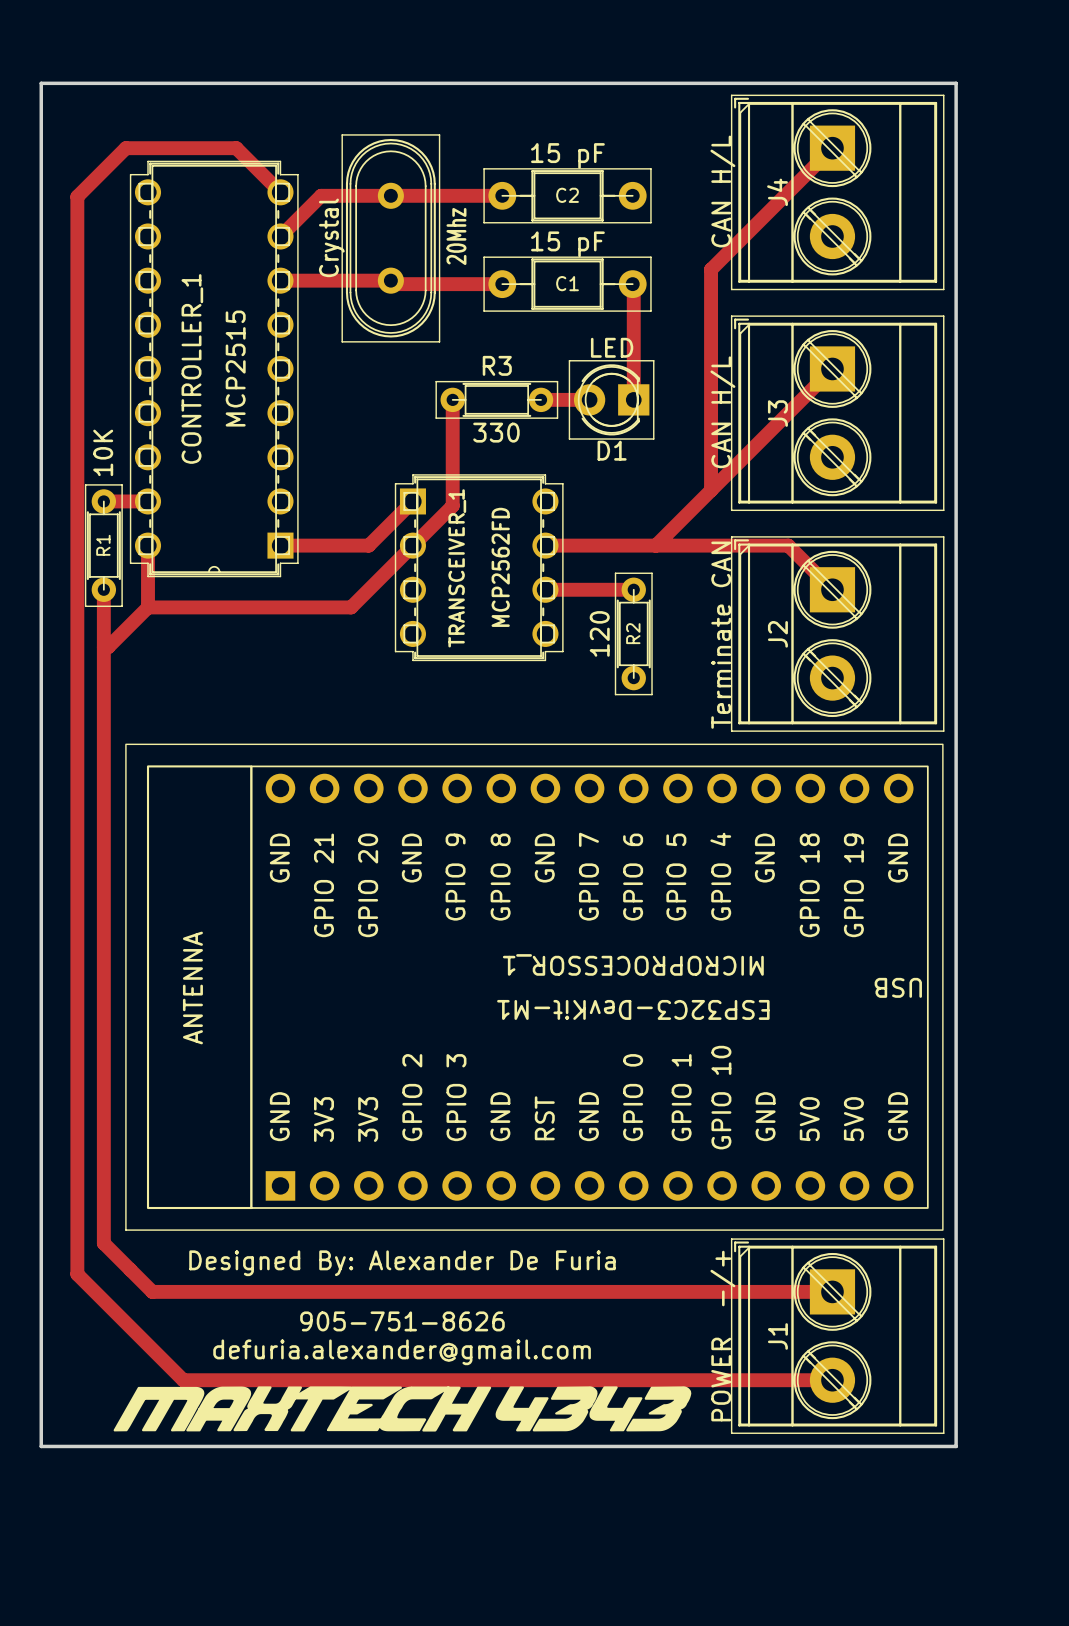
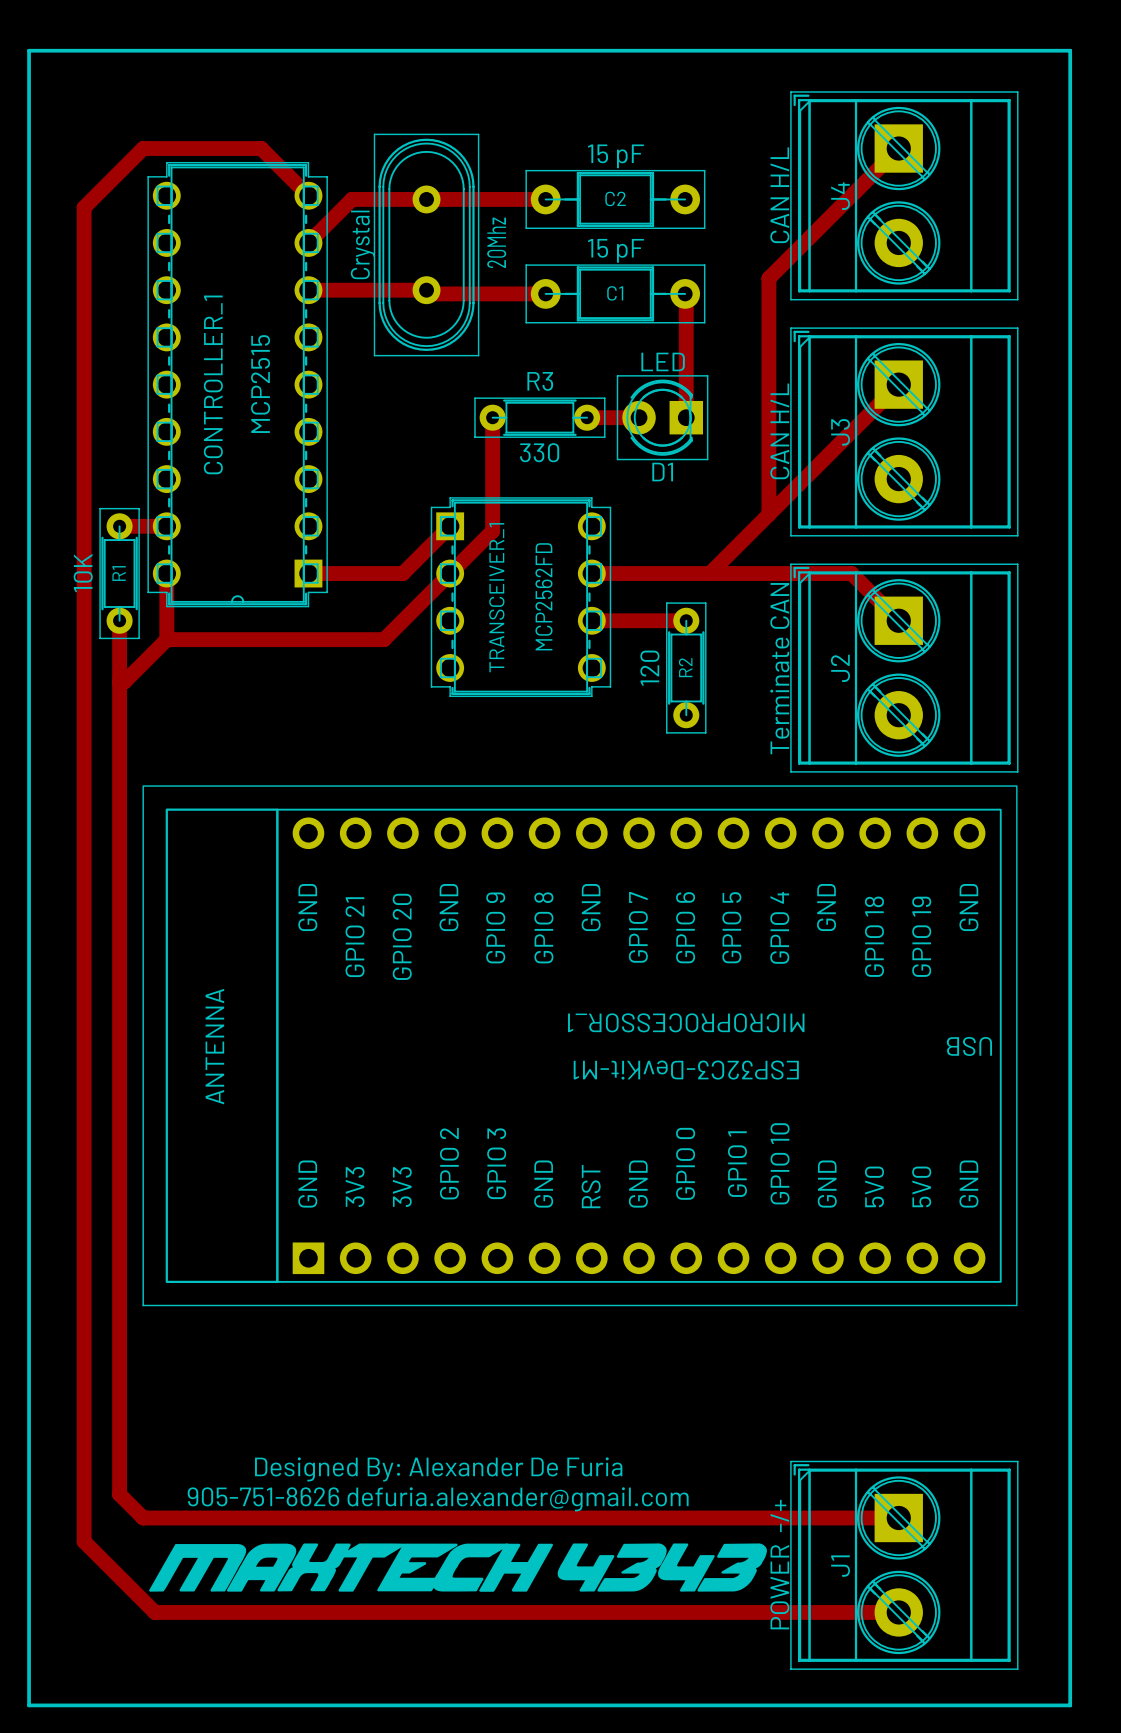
line: none -> (29, 50) (29, 1705) (1070, 1705) (1070, 50) (29, 50)
board edge: (41, 83) (41, 1446) (956, 1446) (956, 83) (41, 83) -> none
track: (77, 196) (77, 1274) (183, 1380) (832, 1380) -> (91, 200) (84, 207) (84, 1541) (155, 1612) (898, 1612)
R1 value position: 10K (103, 452) -> 10K (83, 573)
track: (103, 1243) (152, 1291) (832, 1291) -> (119, 1319) (119, 1494) (143, 1518) (898, 1518)
text position: Designed By: Alexander De Furia (402, 1263) -> Designed By: Alexander De Furia (438, 1469)
text: 905-751-8626 (402, 1321) -> none
J1 position: (837, 1336) -> (904, 1565)
text: defuria.alexander@gmail.com (402, 1352) -> none
drawing: [532, 1386, 598, 1432] -> none
drawing: [626, 1386, 692, 1432] -> none
drawing position: (218, 1408) -> (261, 1567)
drawing position: (267, 1408) -> (314, 1567)
drawing position: (321, 1408) -> (371, 1567)
drawing position: (364, 1408) -> (417, 1567)
drawing position: (414, 1408) -> (470, 1567)
drawing position: (522, 1408) -> (586, 1567)
drawing position: (615, 1408) -> (686, 1567)
drawing position: (159, 1409) -> (197, 1567)
drawing position: (456, 1409) -> (516, 1567)
text: none -> 905-751-8626 defuria.alexander@gmail.com (438, 1499)
drawing: none -> [597, 1543, 667, 1592]
drawing: none -> [697, 1543, 767, 1592]

